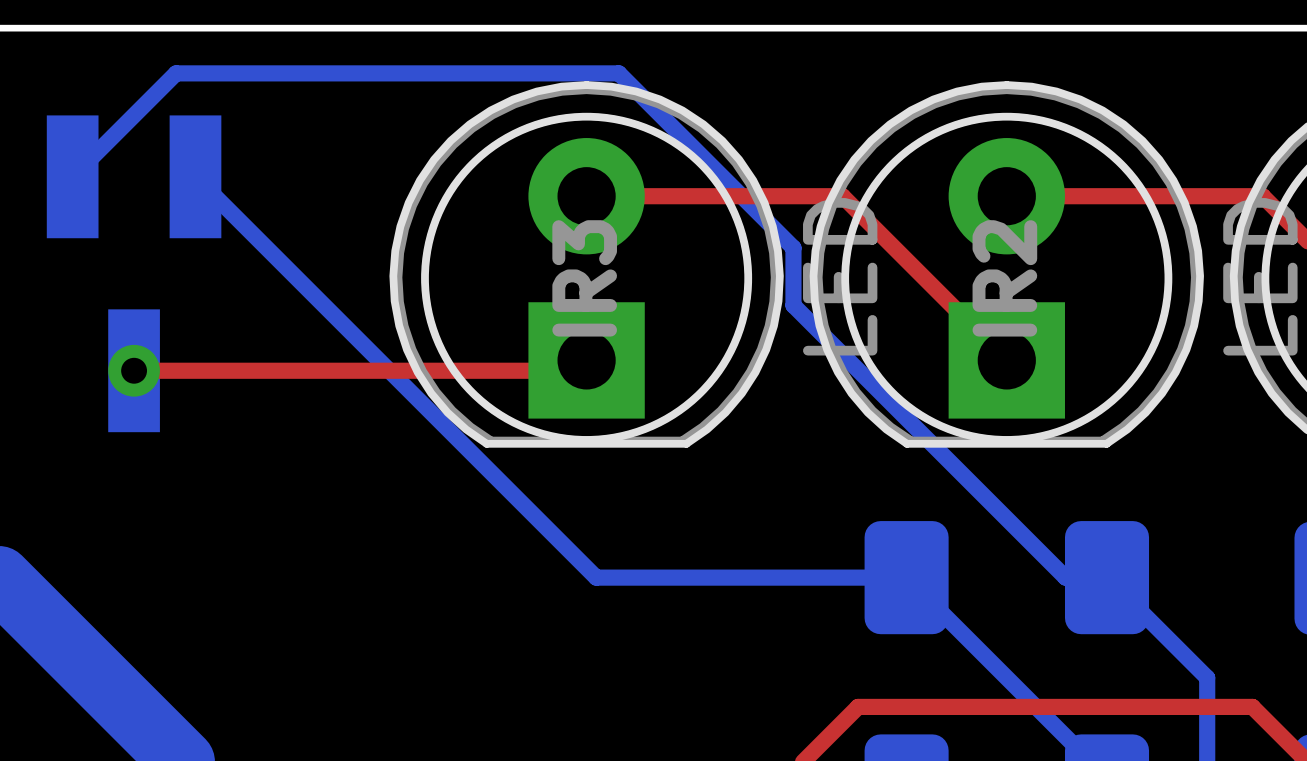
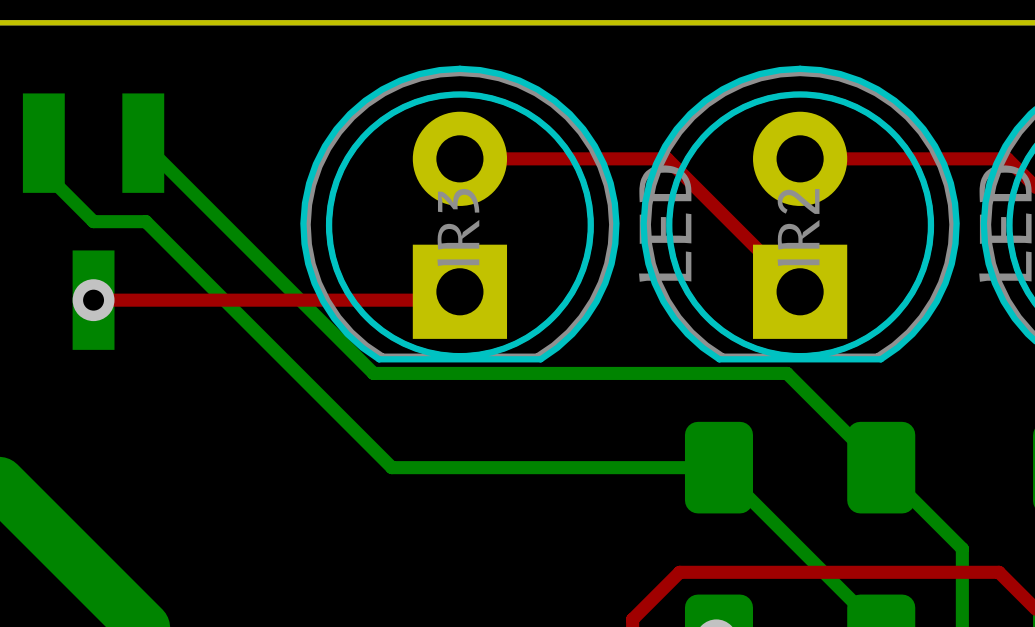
bottom track: (72, 176) (176, 73) (618, 73) (793, 247) (793, 305) (1065, 577) (1107, 577) -> (373, 373) (787, 373) (881, 467)
bottom track: (479, 461) (596, 577) -> (43, 143) (43, 171) (93, 221) (145, 221) (391, 467) (467, 467)

